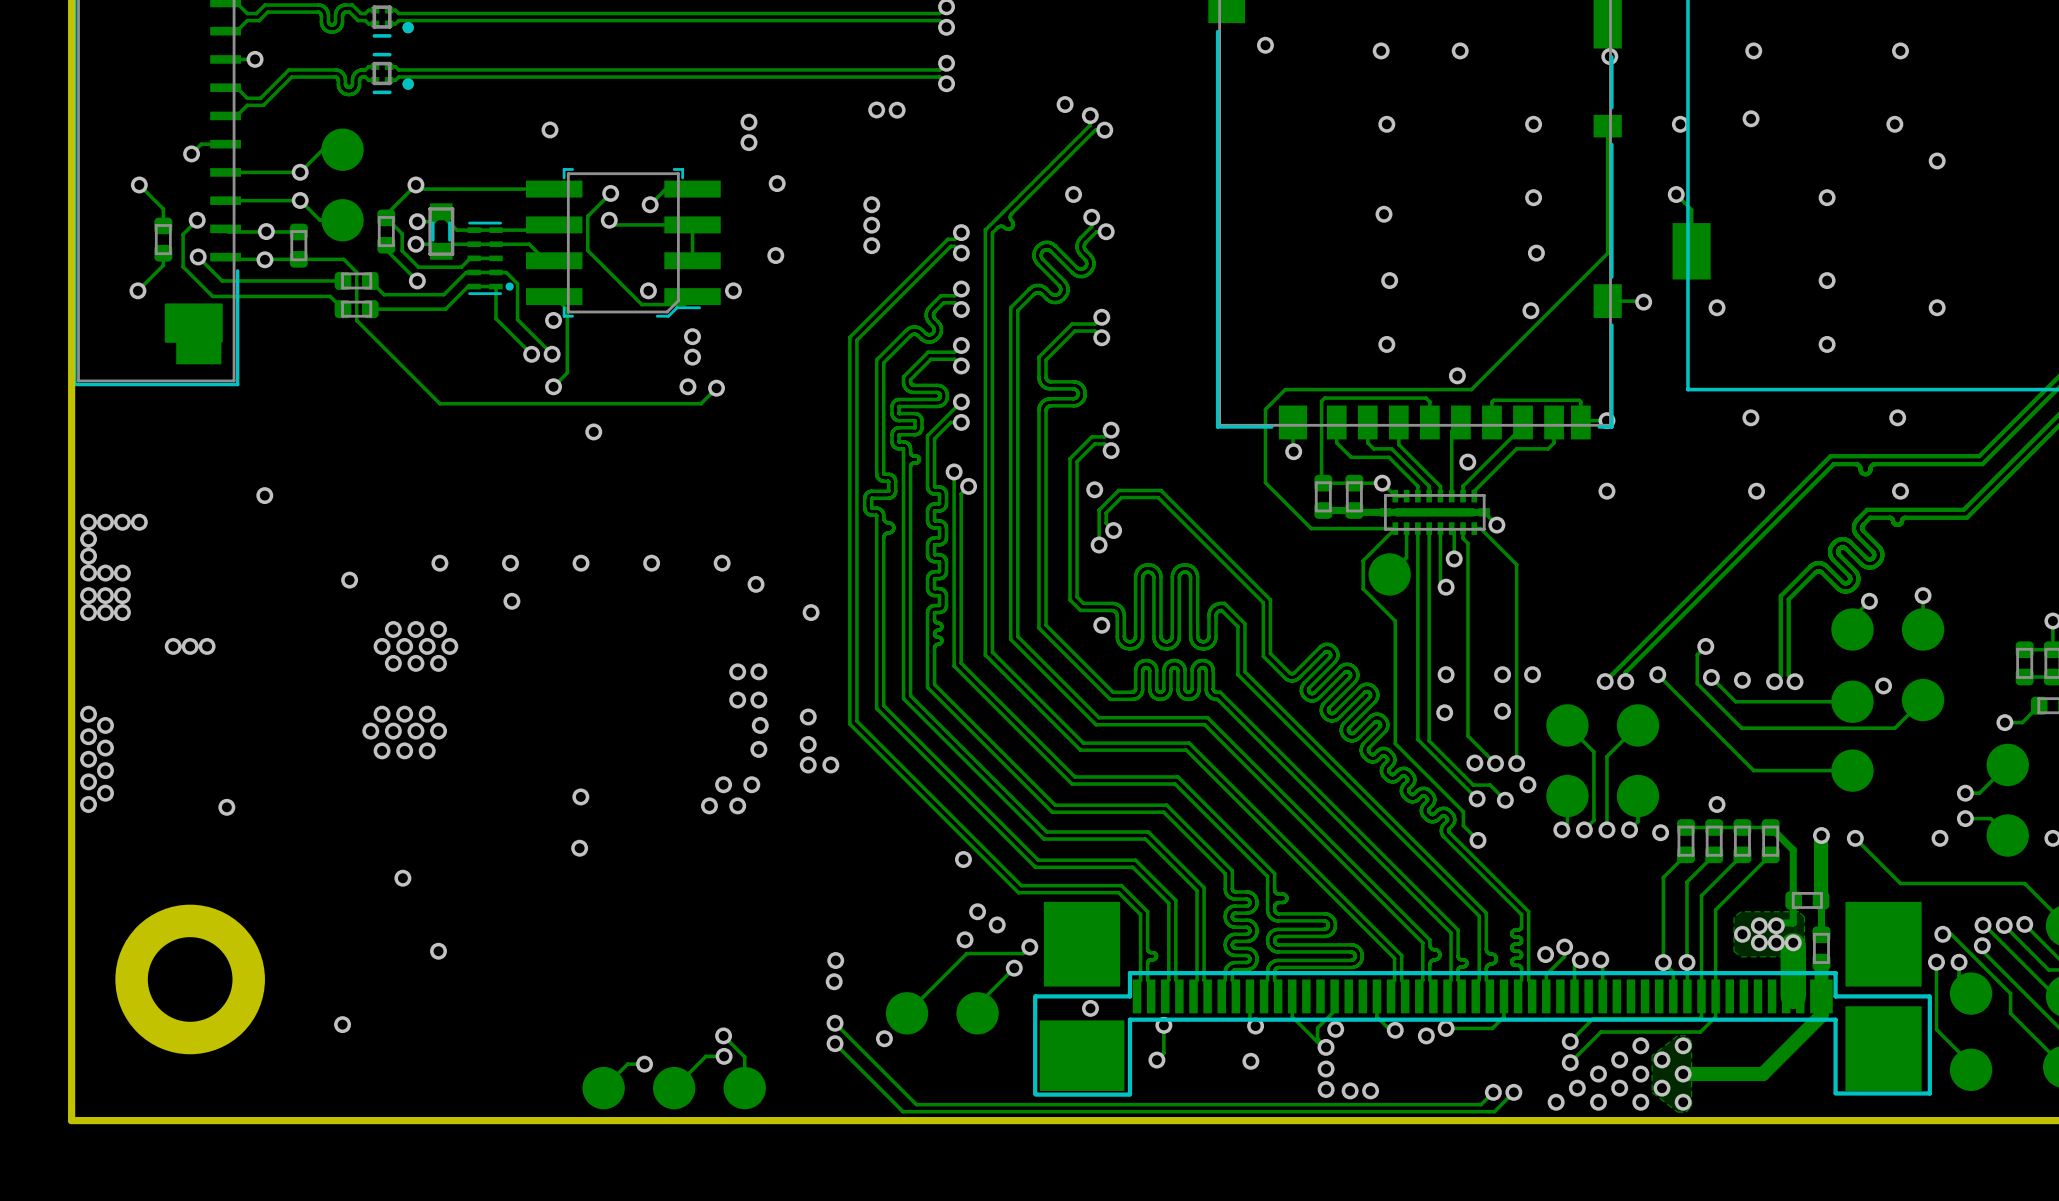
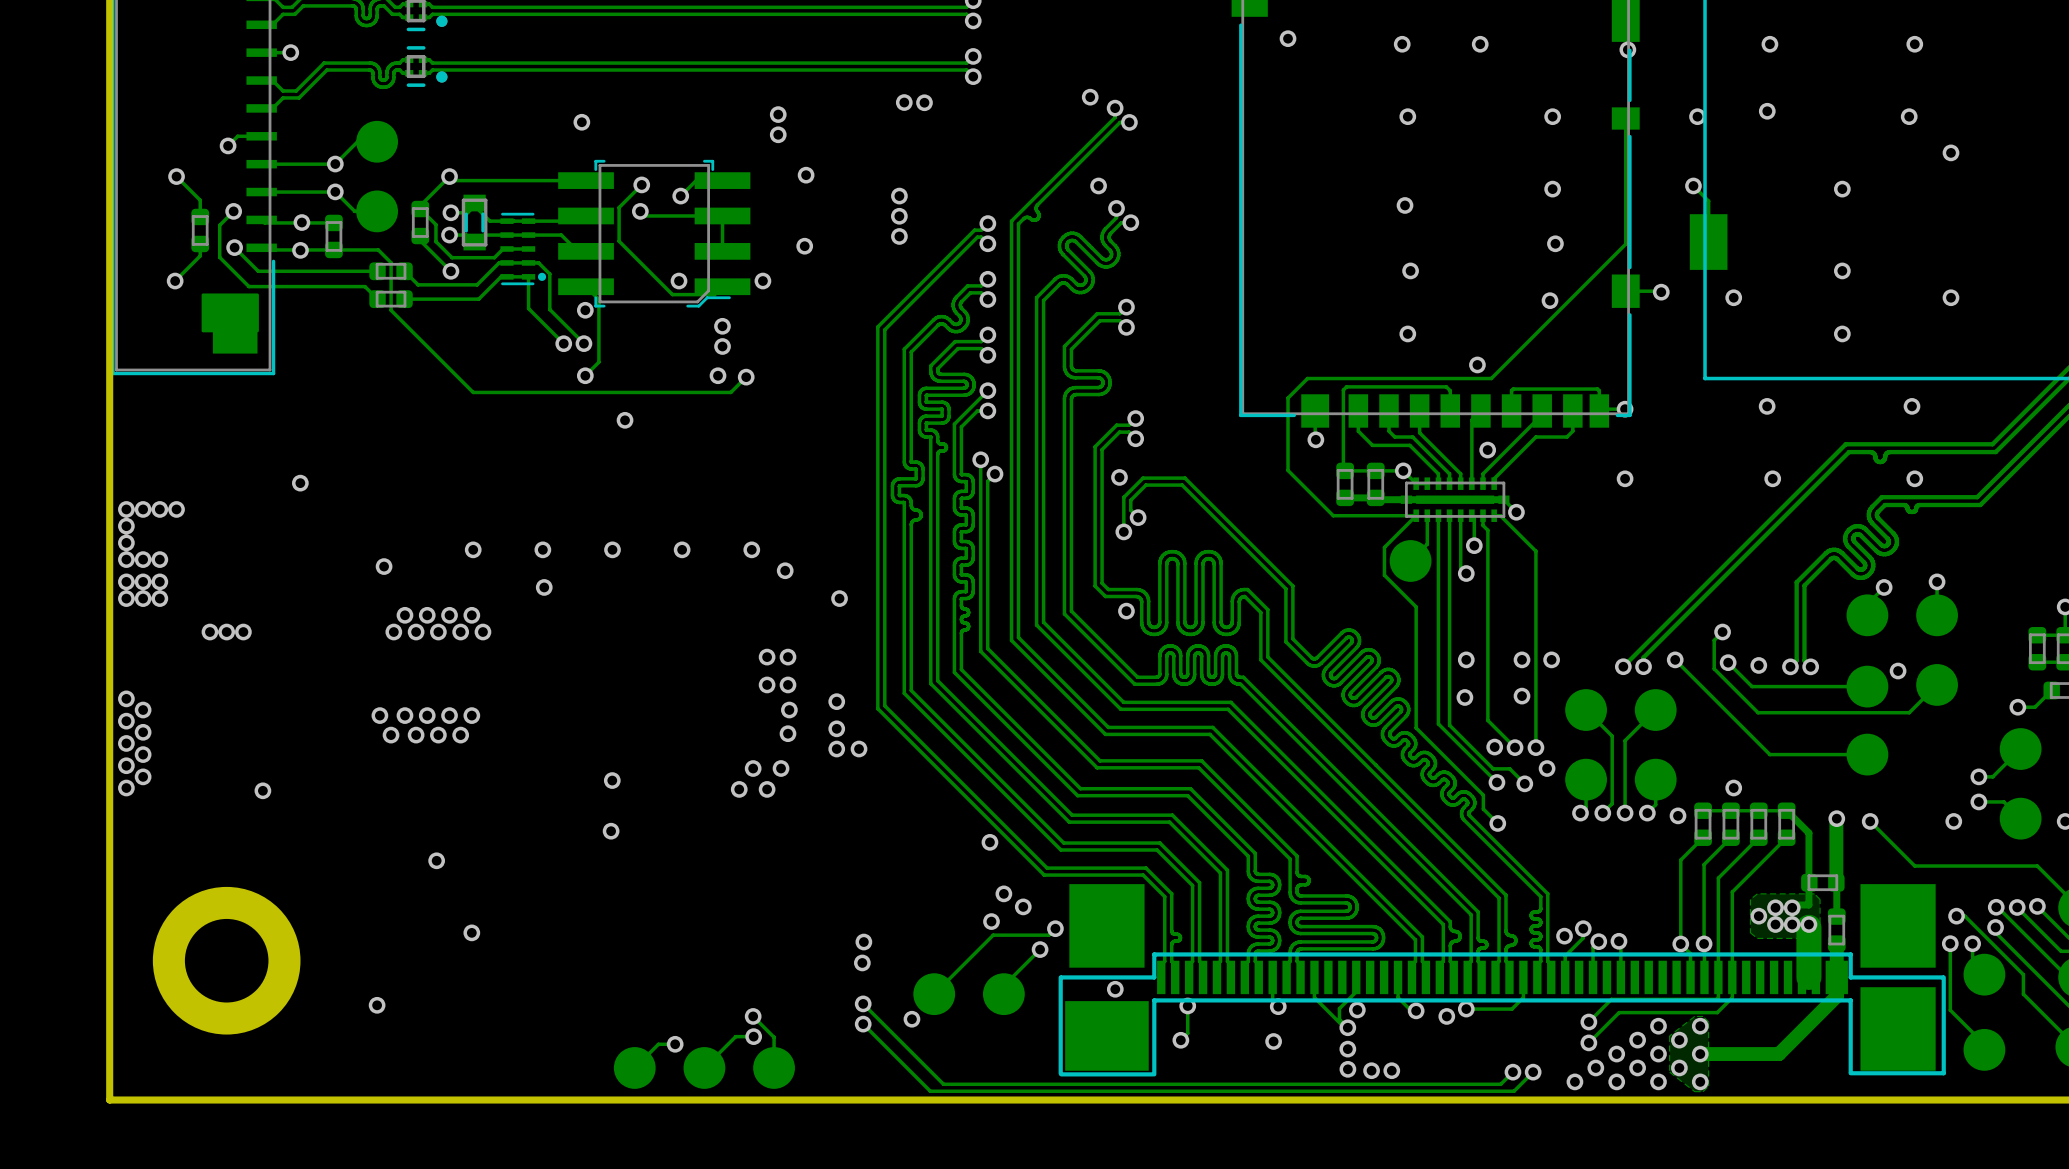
via: none -> (404, 615)
via: none -> (393, 632)
via: (393, 663) -> none
via: (415, 663) -> none
via: (438, 663) -> none
via: (382, 714) -> none
via: (404, 714) -> none
via: (427, 714) -> none
via: none -> (379, 715)
via: none -> (391, 735)

